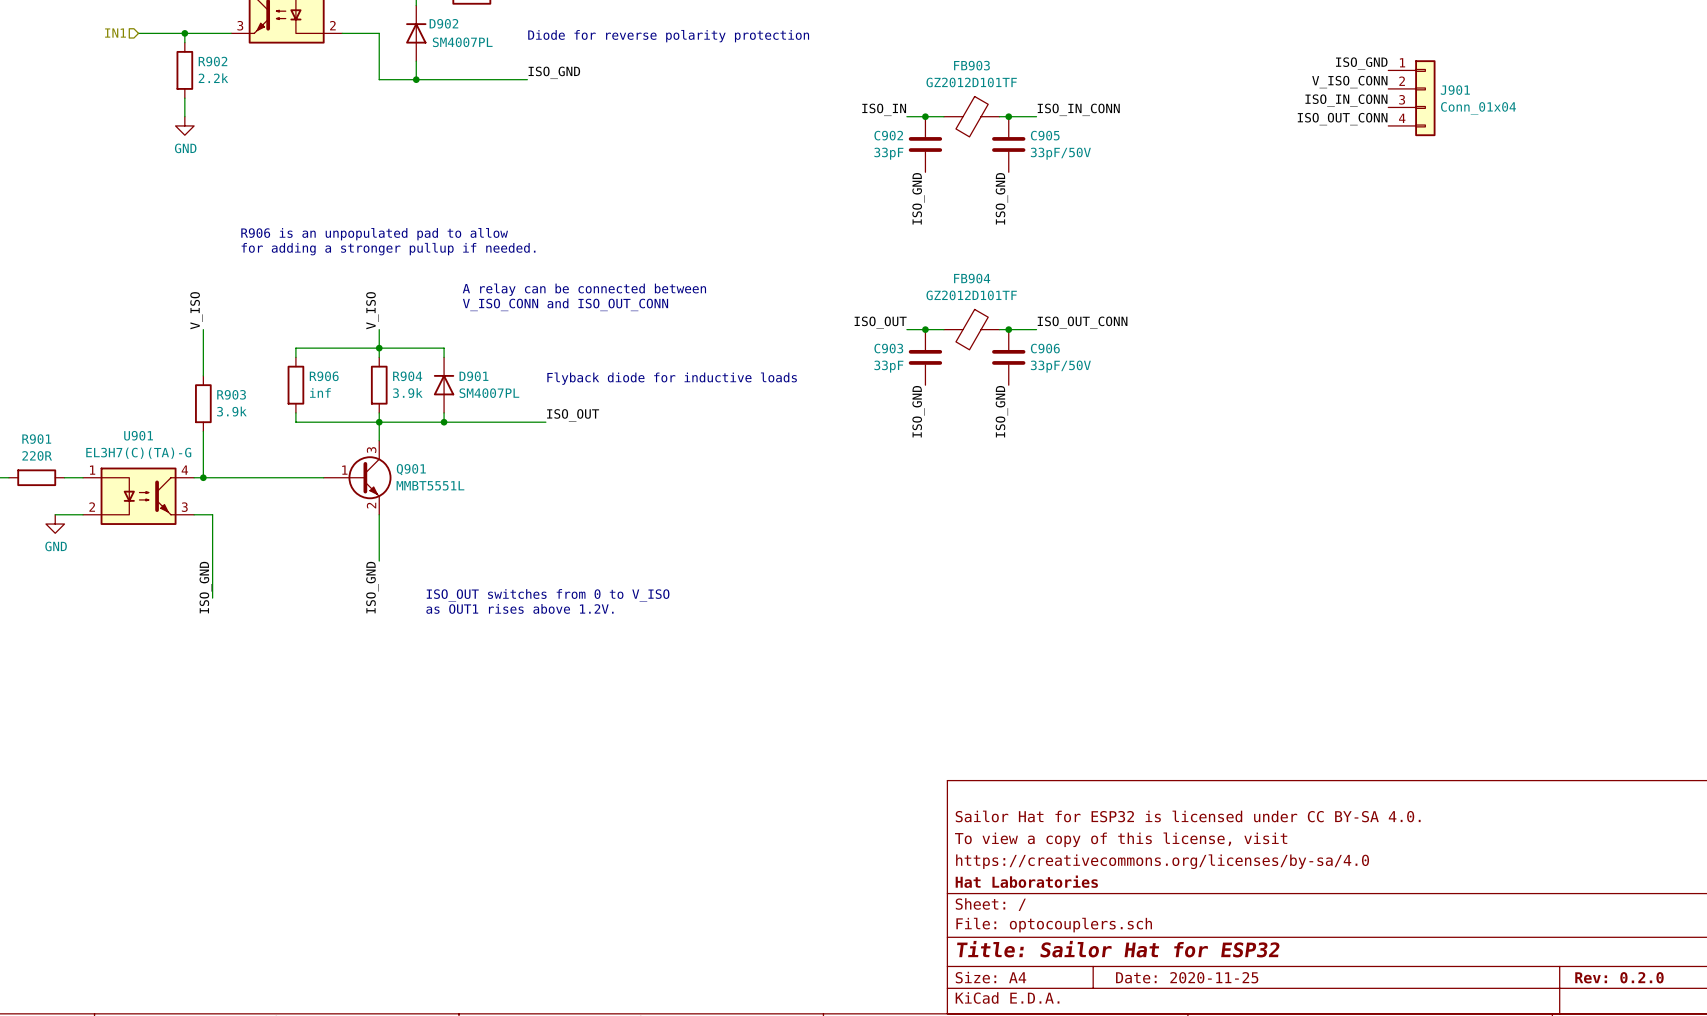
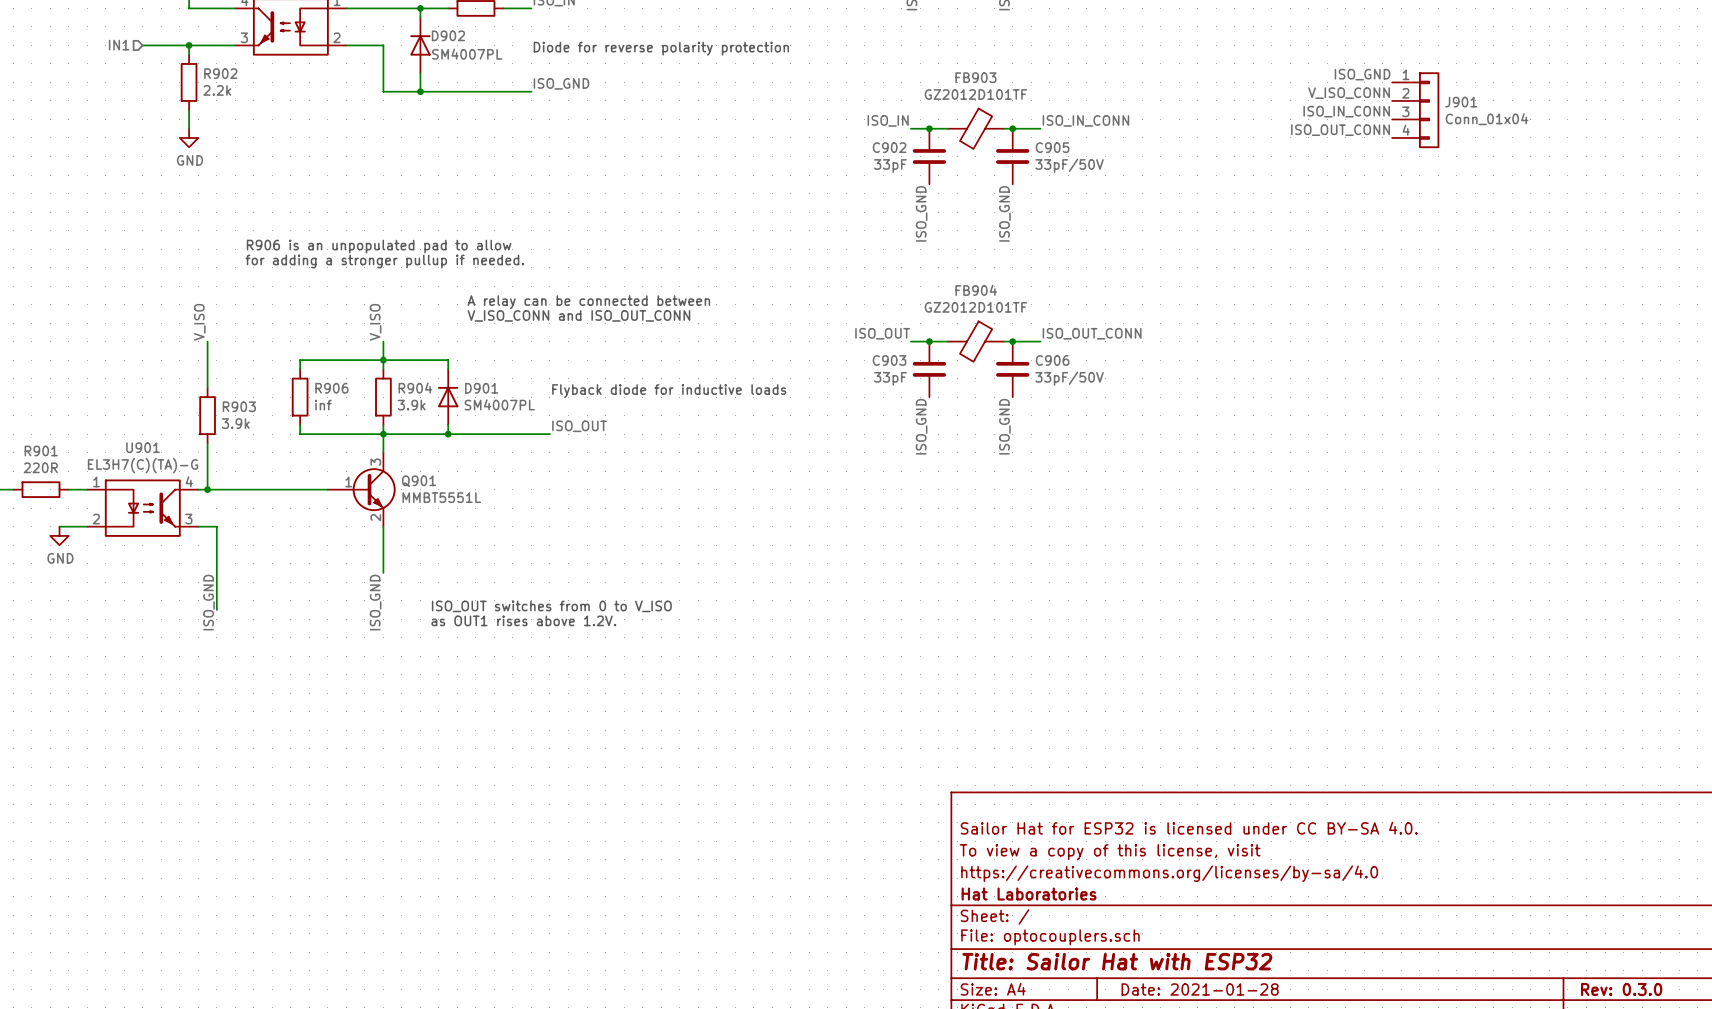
title block: Title: Sailor Hat for ESP32 (1118, 949) -> Title: Sailor Hat with ESP32 (1117, 961)
title block: Date: 2020-11-25 (1187, 977) -> Date: 2021-01-28 (1200, 989)
title block: Rev: 0.2.0 (1619, 977) -> Rev: 0.3.0 (1621, 989)

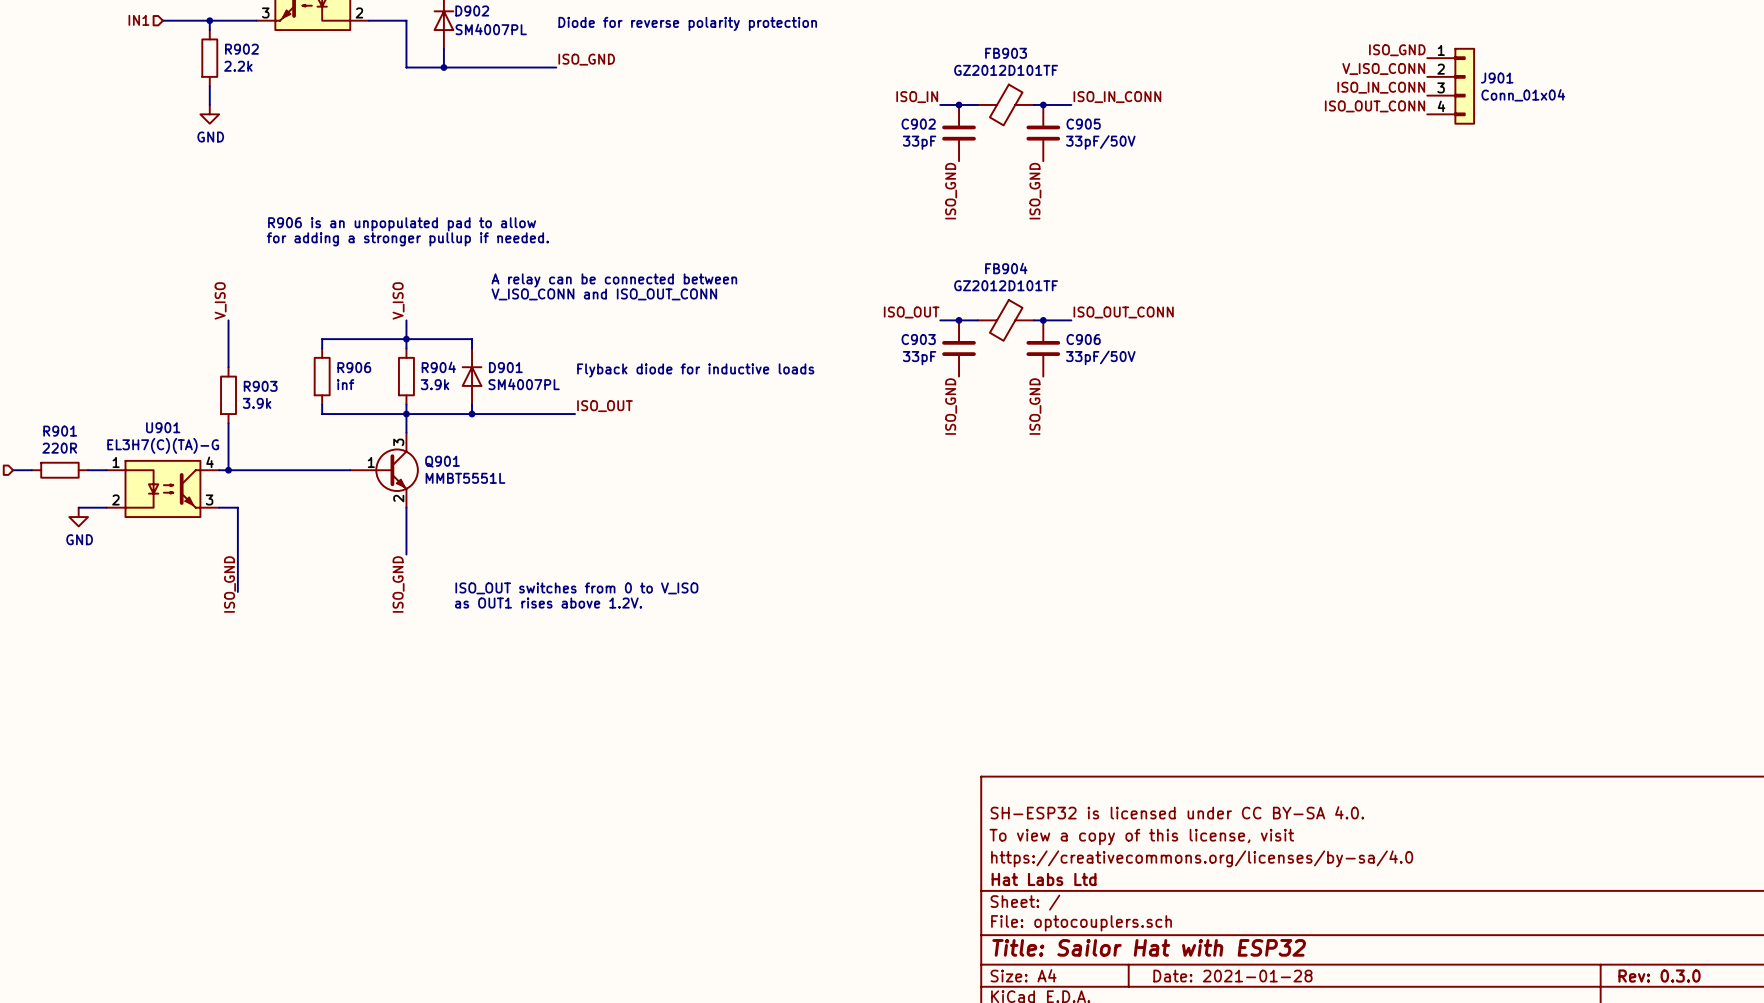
title block: Sailor Hat for ESP32 is licensed under CC BY-SA 4.0. (1189, 828) -> SH-ESP32 is licensed under CC BY-SA 4.0. (1177, 812)
title block: Hat Laboratories (1029, 894) -> Hat Labs Ltd (1044, 879)

